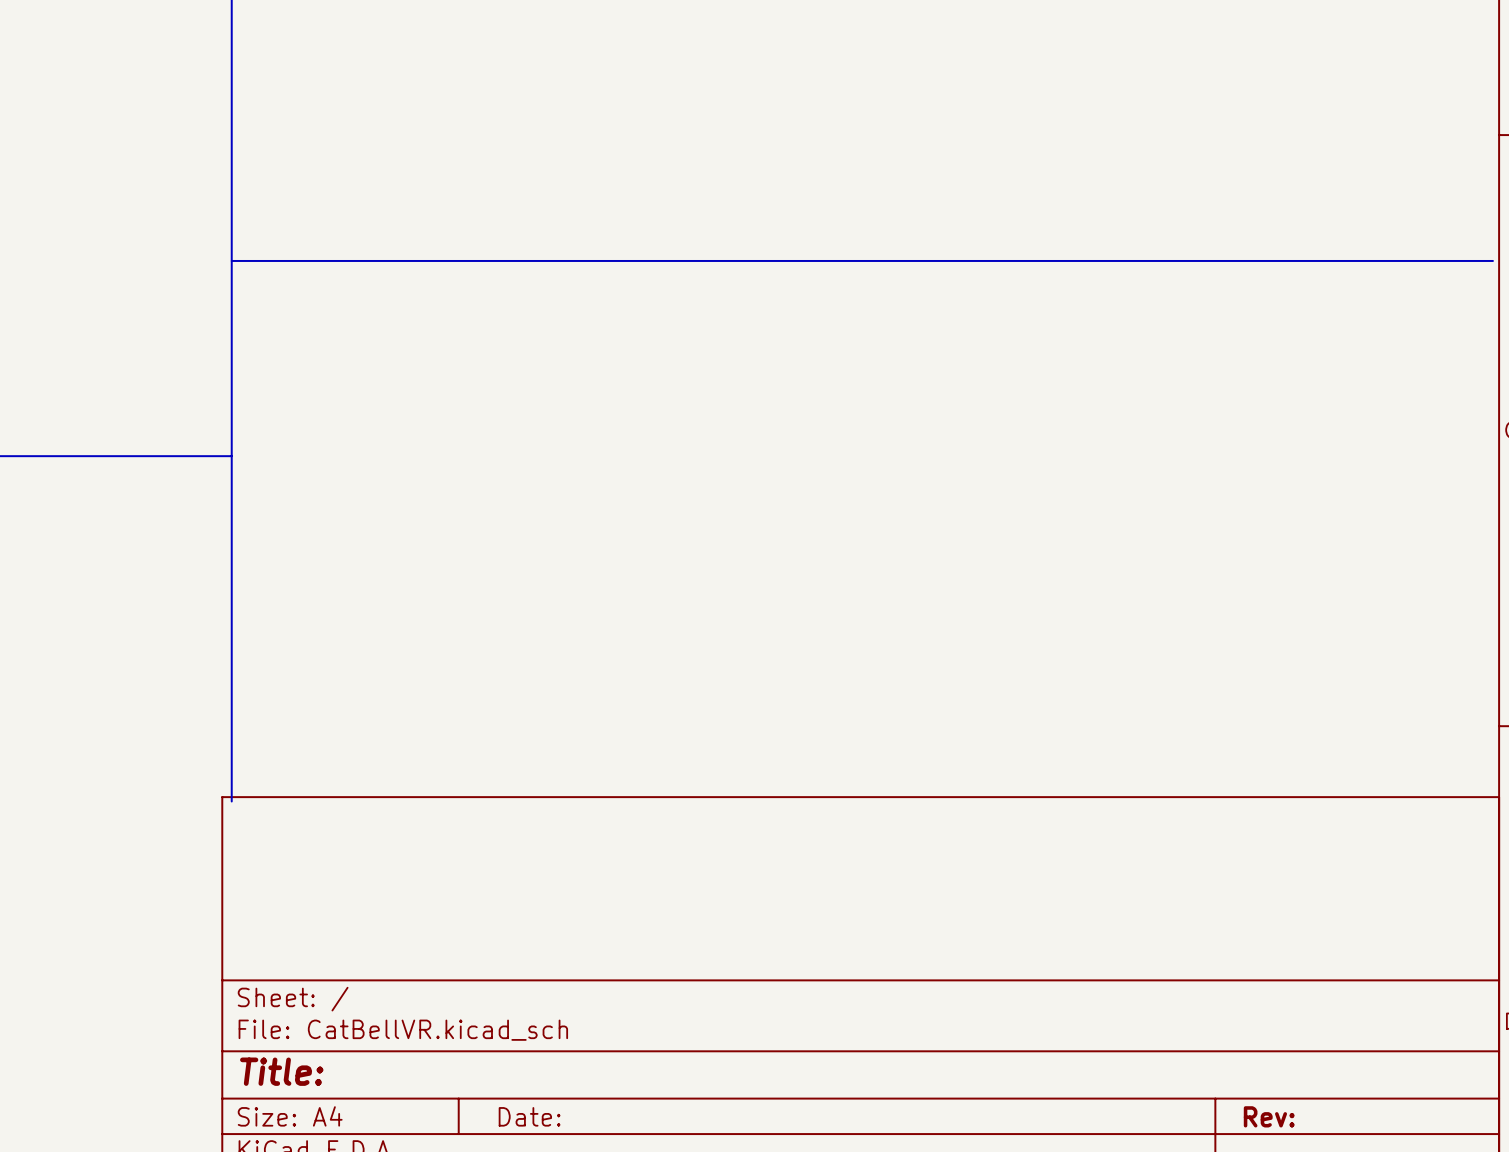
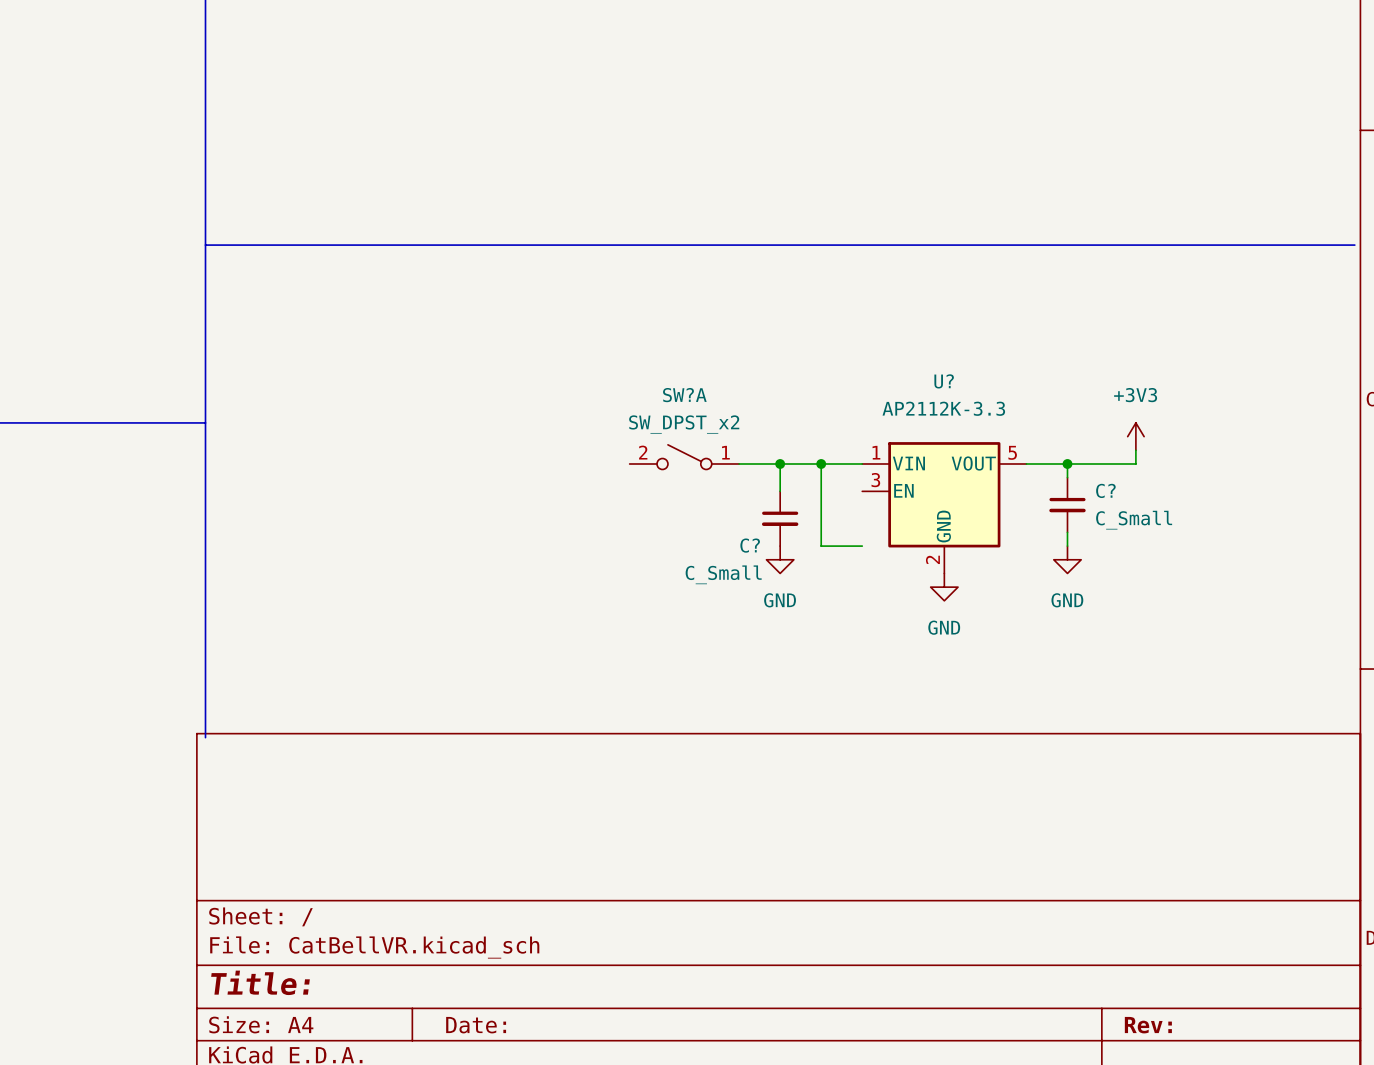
power symbol: none -> +3V3 (1135, 436)
wire: none -> (1135, 450) (1135, 463) (1026, 463)
SW?A: none -> SW_DPST_x2 (684, 457)
wire: none -> (739, 463) (862, 463)
wire: none -> (780, 463) (780, 491)
junction: none -> (780, 463)
wire: none -> (821, 463) (821, 546) (862, 546)
junction: none -> (821, 463)
wire: none -> (1067, 463) (1067, 477)
junction: none -> (1067, 463)
C?: none -> C_Small (1067, 505)
U?: none -> AP2112K-3.3 (944, 507)
C?: none -> C_Small (780, 518)
wire: none -> (1067, 532) (1067, 546)
power symbol: none -> GND (780, 559)
power symbol: none -> GND (1067, 559)
power symbol: none -> GND (944, 587)

